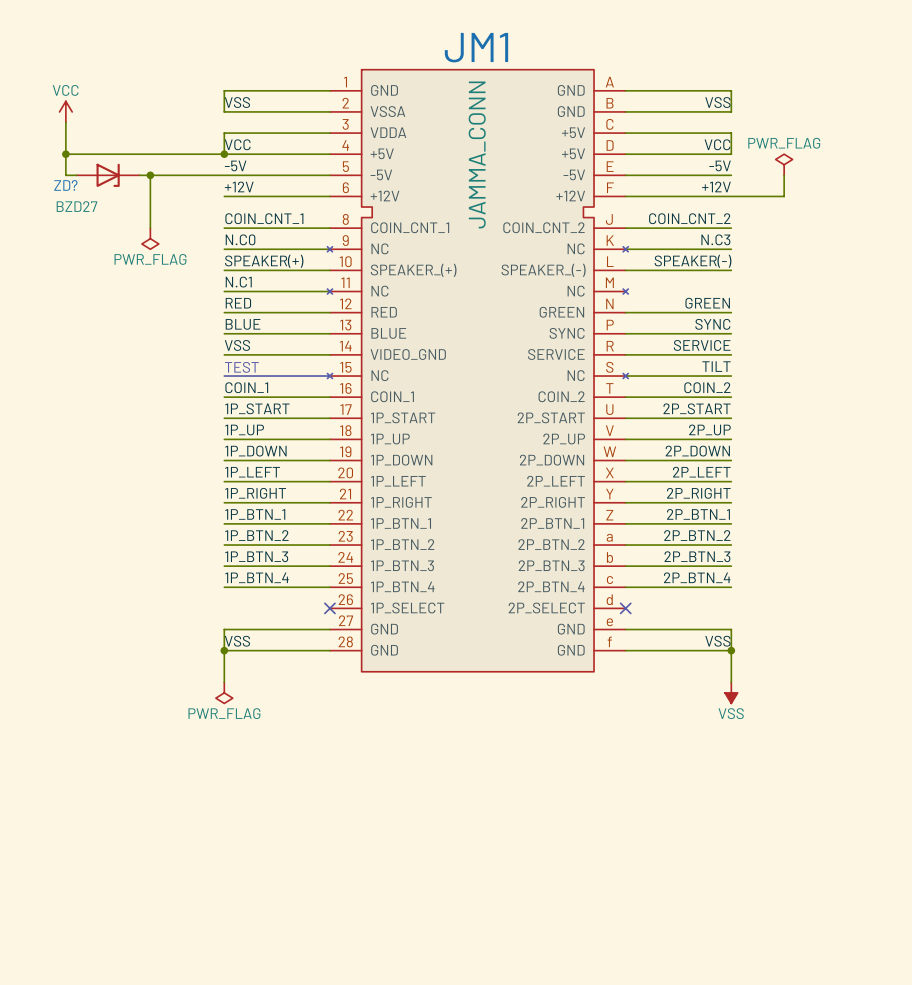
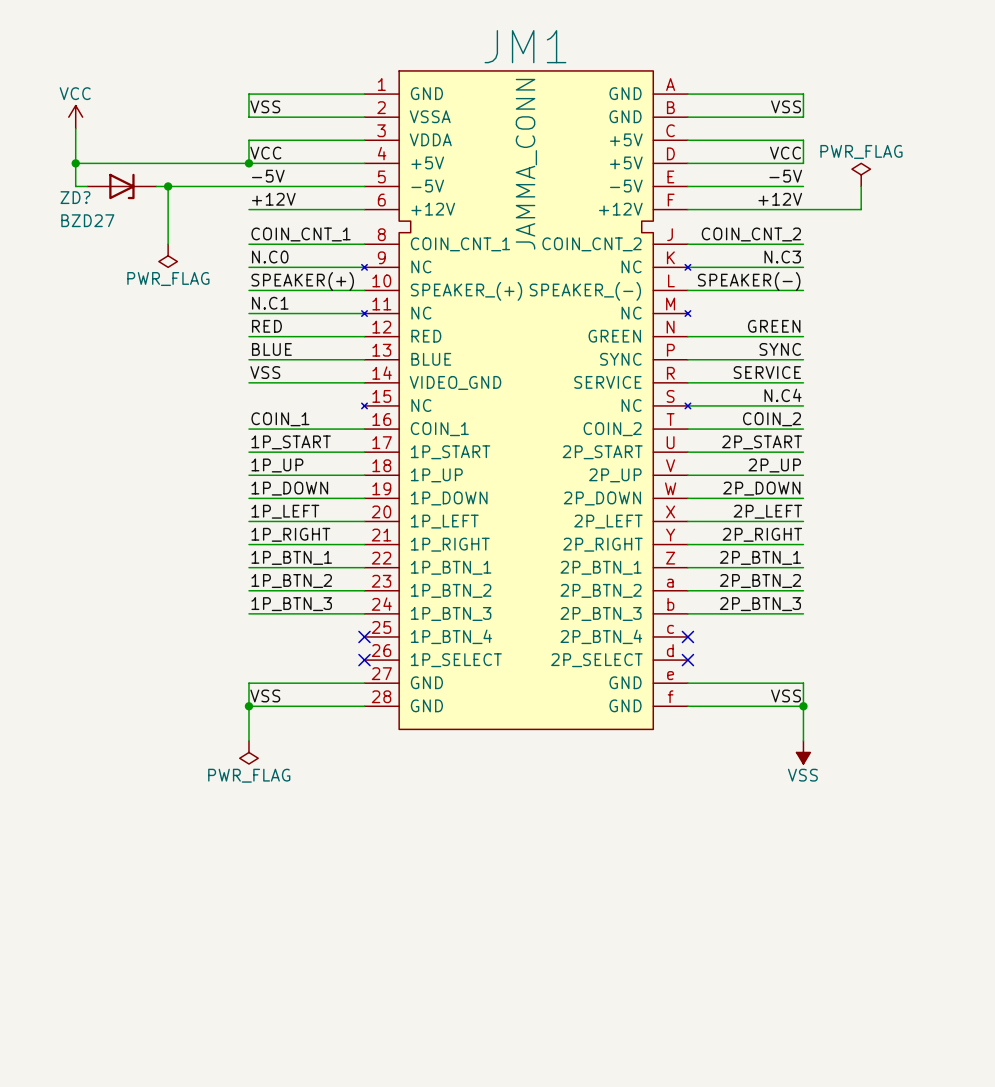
label: TILT (716, 366) -> N.C4 (783, 395)
text: TEST (241, 367) -> none
line: (224, 376) (329, 376) -> none
label: 1P_BTN_4 (256, 577) -> none
label: 2P_BTN_4 (697, 577) -> none
wire: (224, 587) (329, 587) -> none
no-connect mark: none -> (364, 636)
wire: (625, 587) (731, 587) -> none
no-connect mark: none -> (687, 636)

